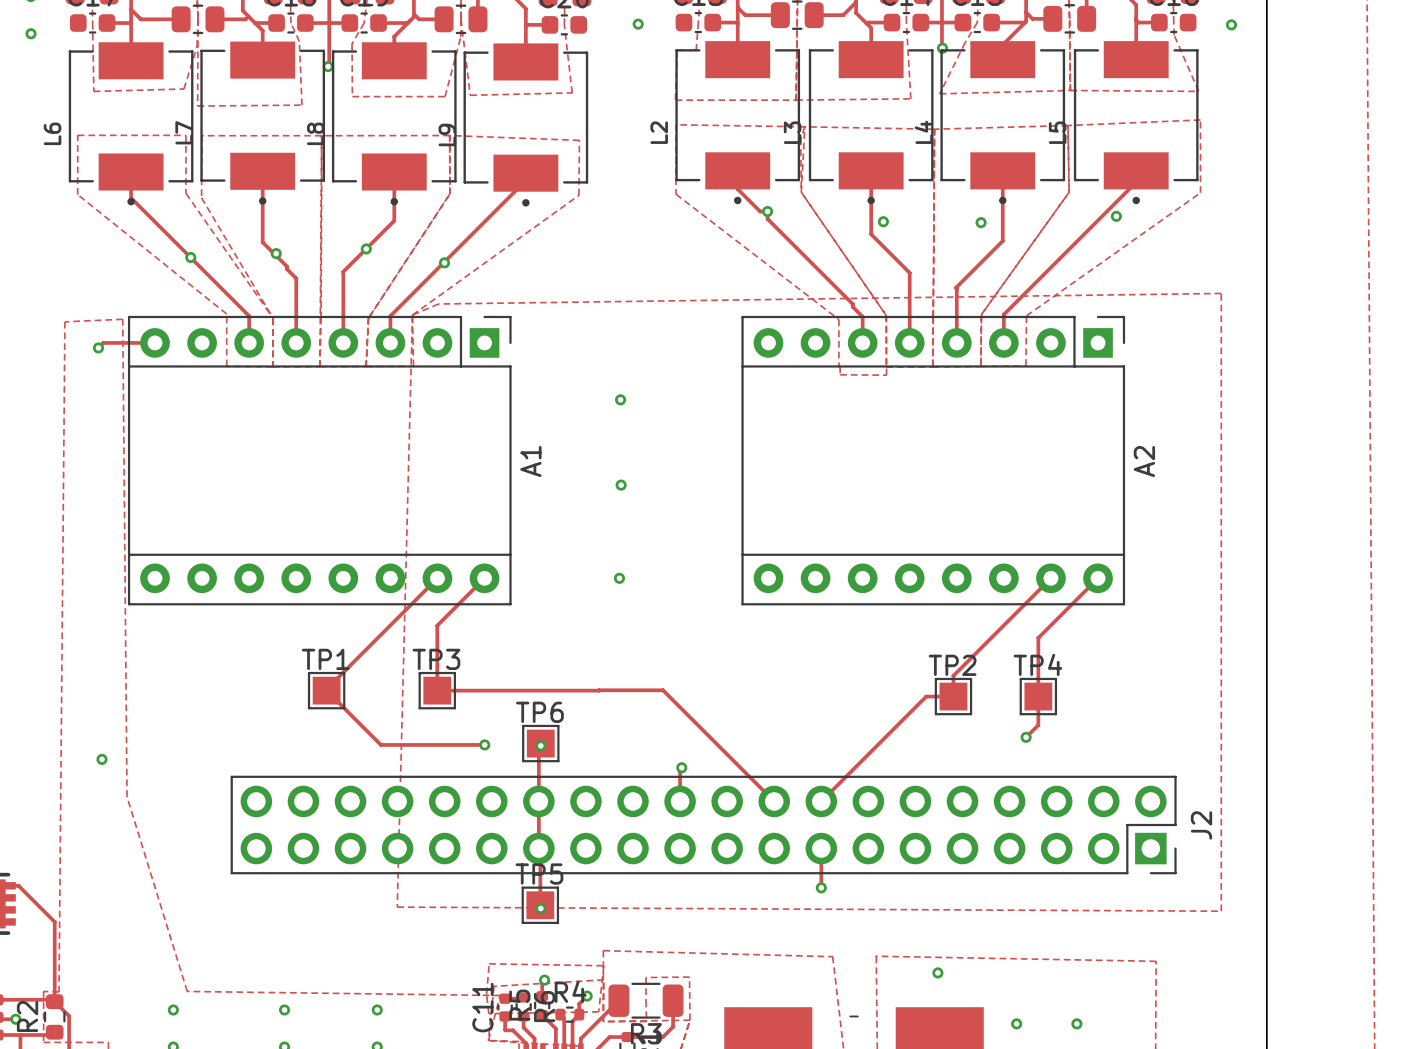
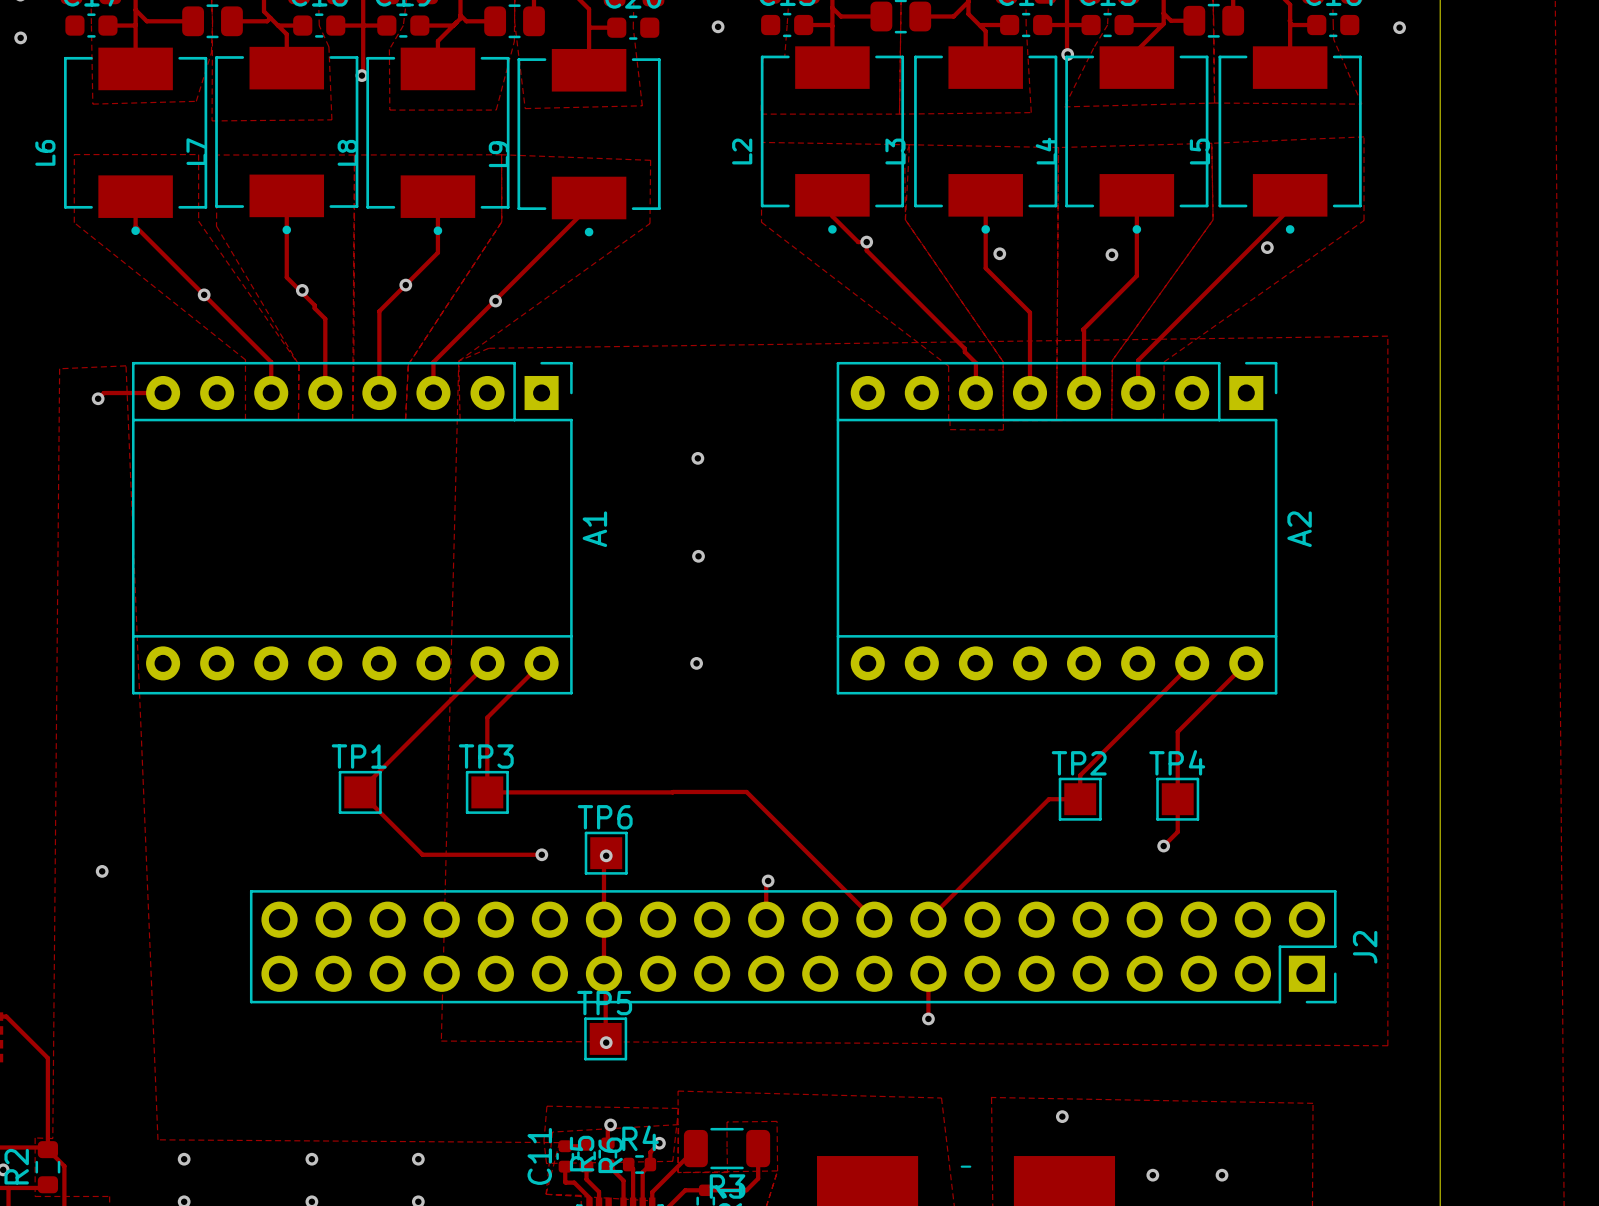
zone outline: (122, 319) (127, 796) (187, 991) (500, 995) -> (126, 365) (157, 1139) (559, 1142)

